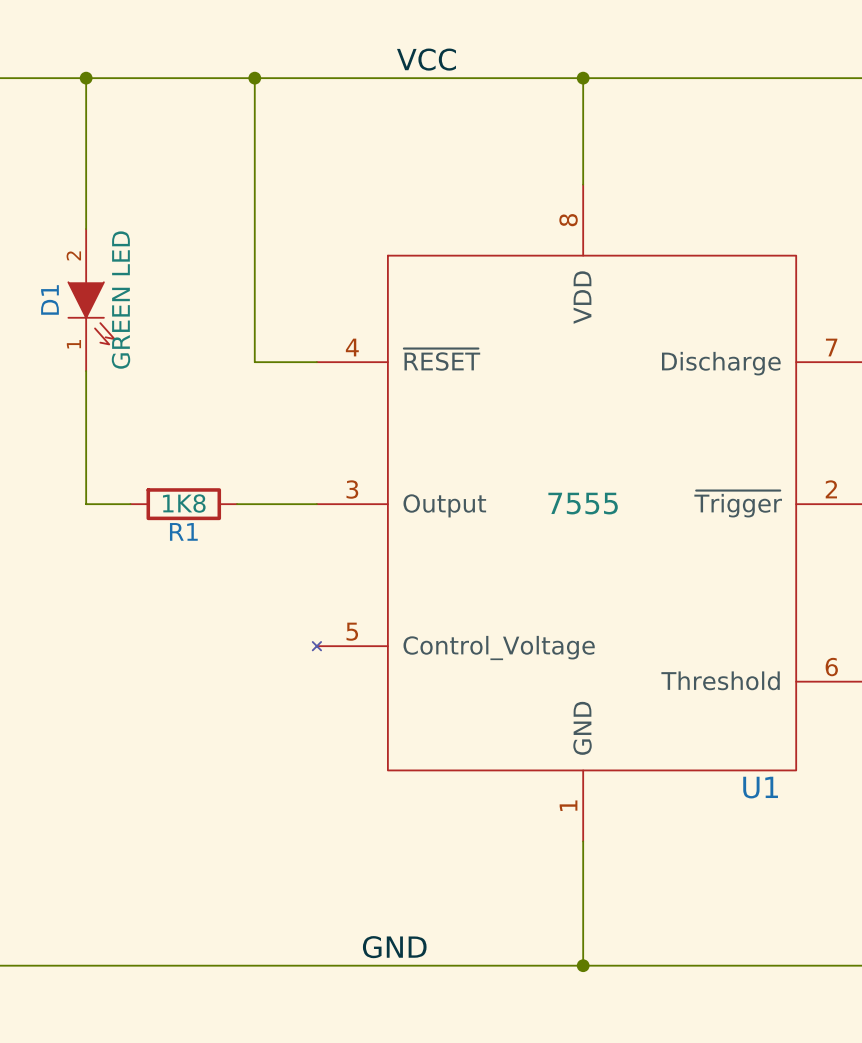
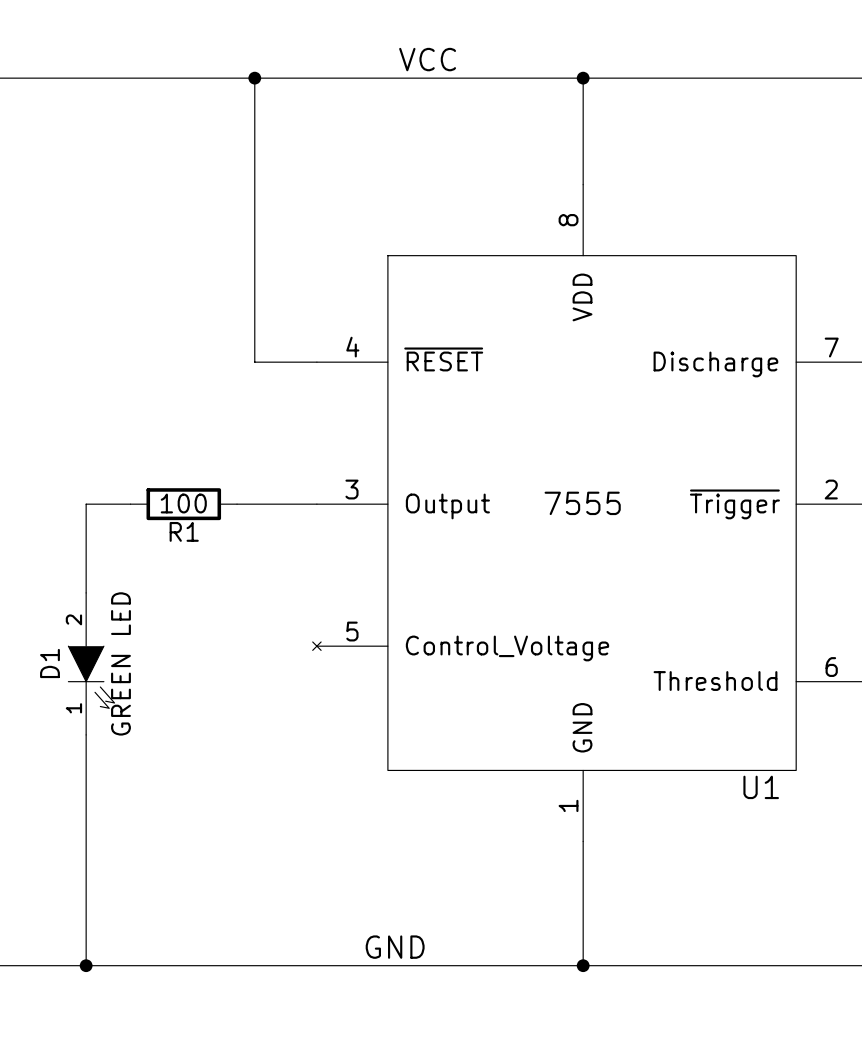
wire: (86, 78) (86, 229) -> none
junction: (86, 78) -> none
D1 position: (91, 300) -> (91, 663)
wire: (86, 371) (86, 504) -> (86, 592) (86, 504)
R1 value: 1K8 (184, 503) -> 100 (183, 503)
wire: none -> (86, 734) (86, 965)
junction: none -> (86, 965)

